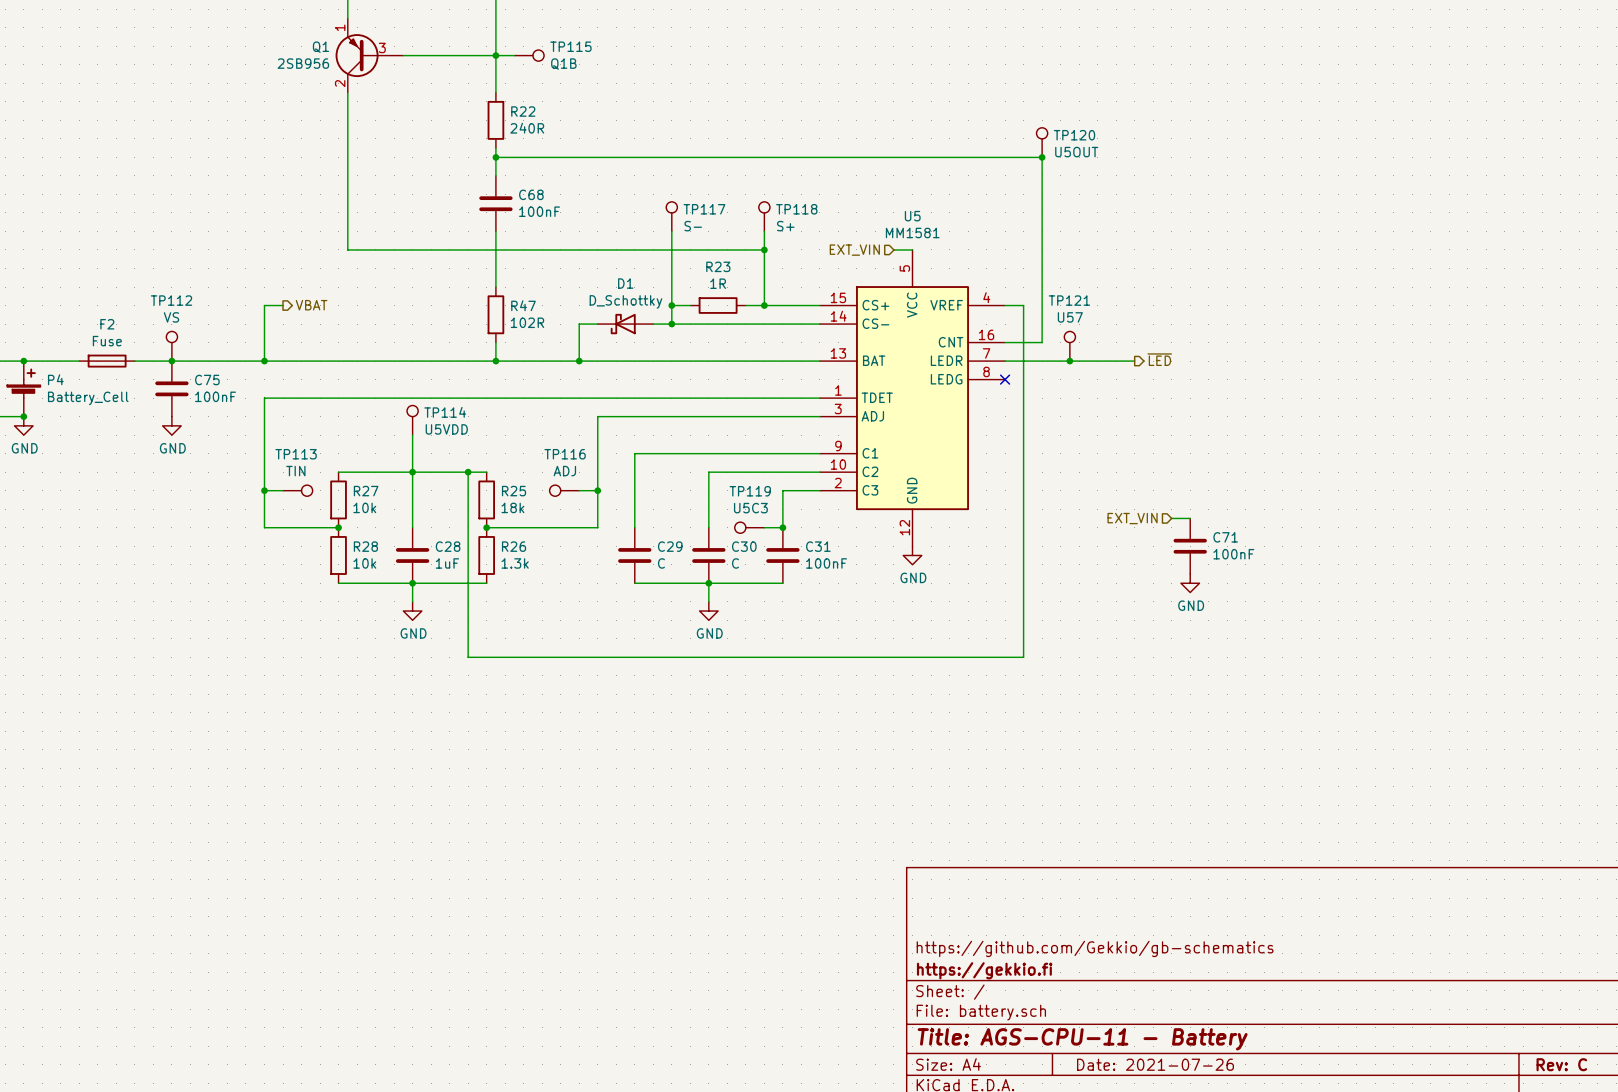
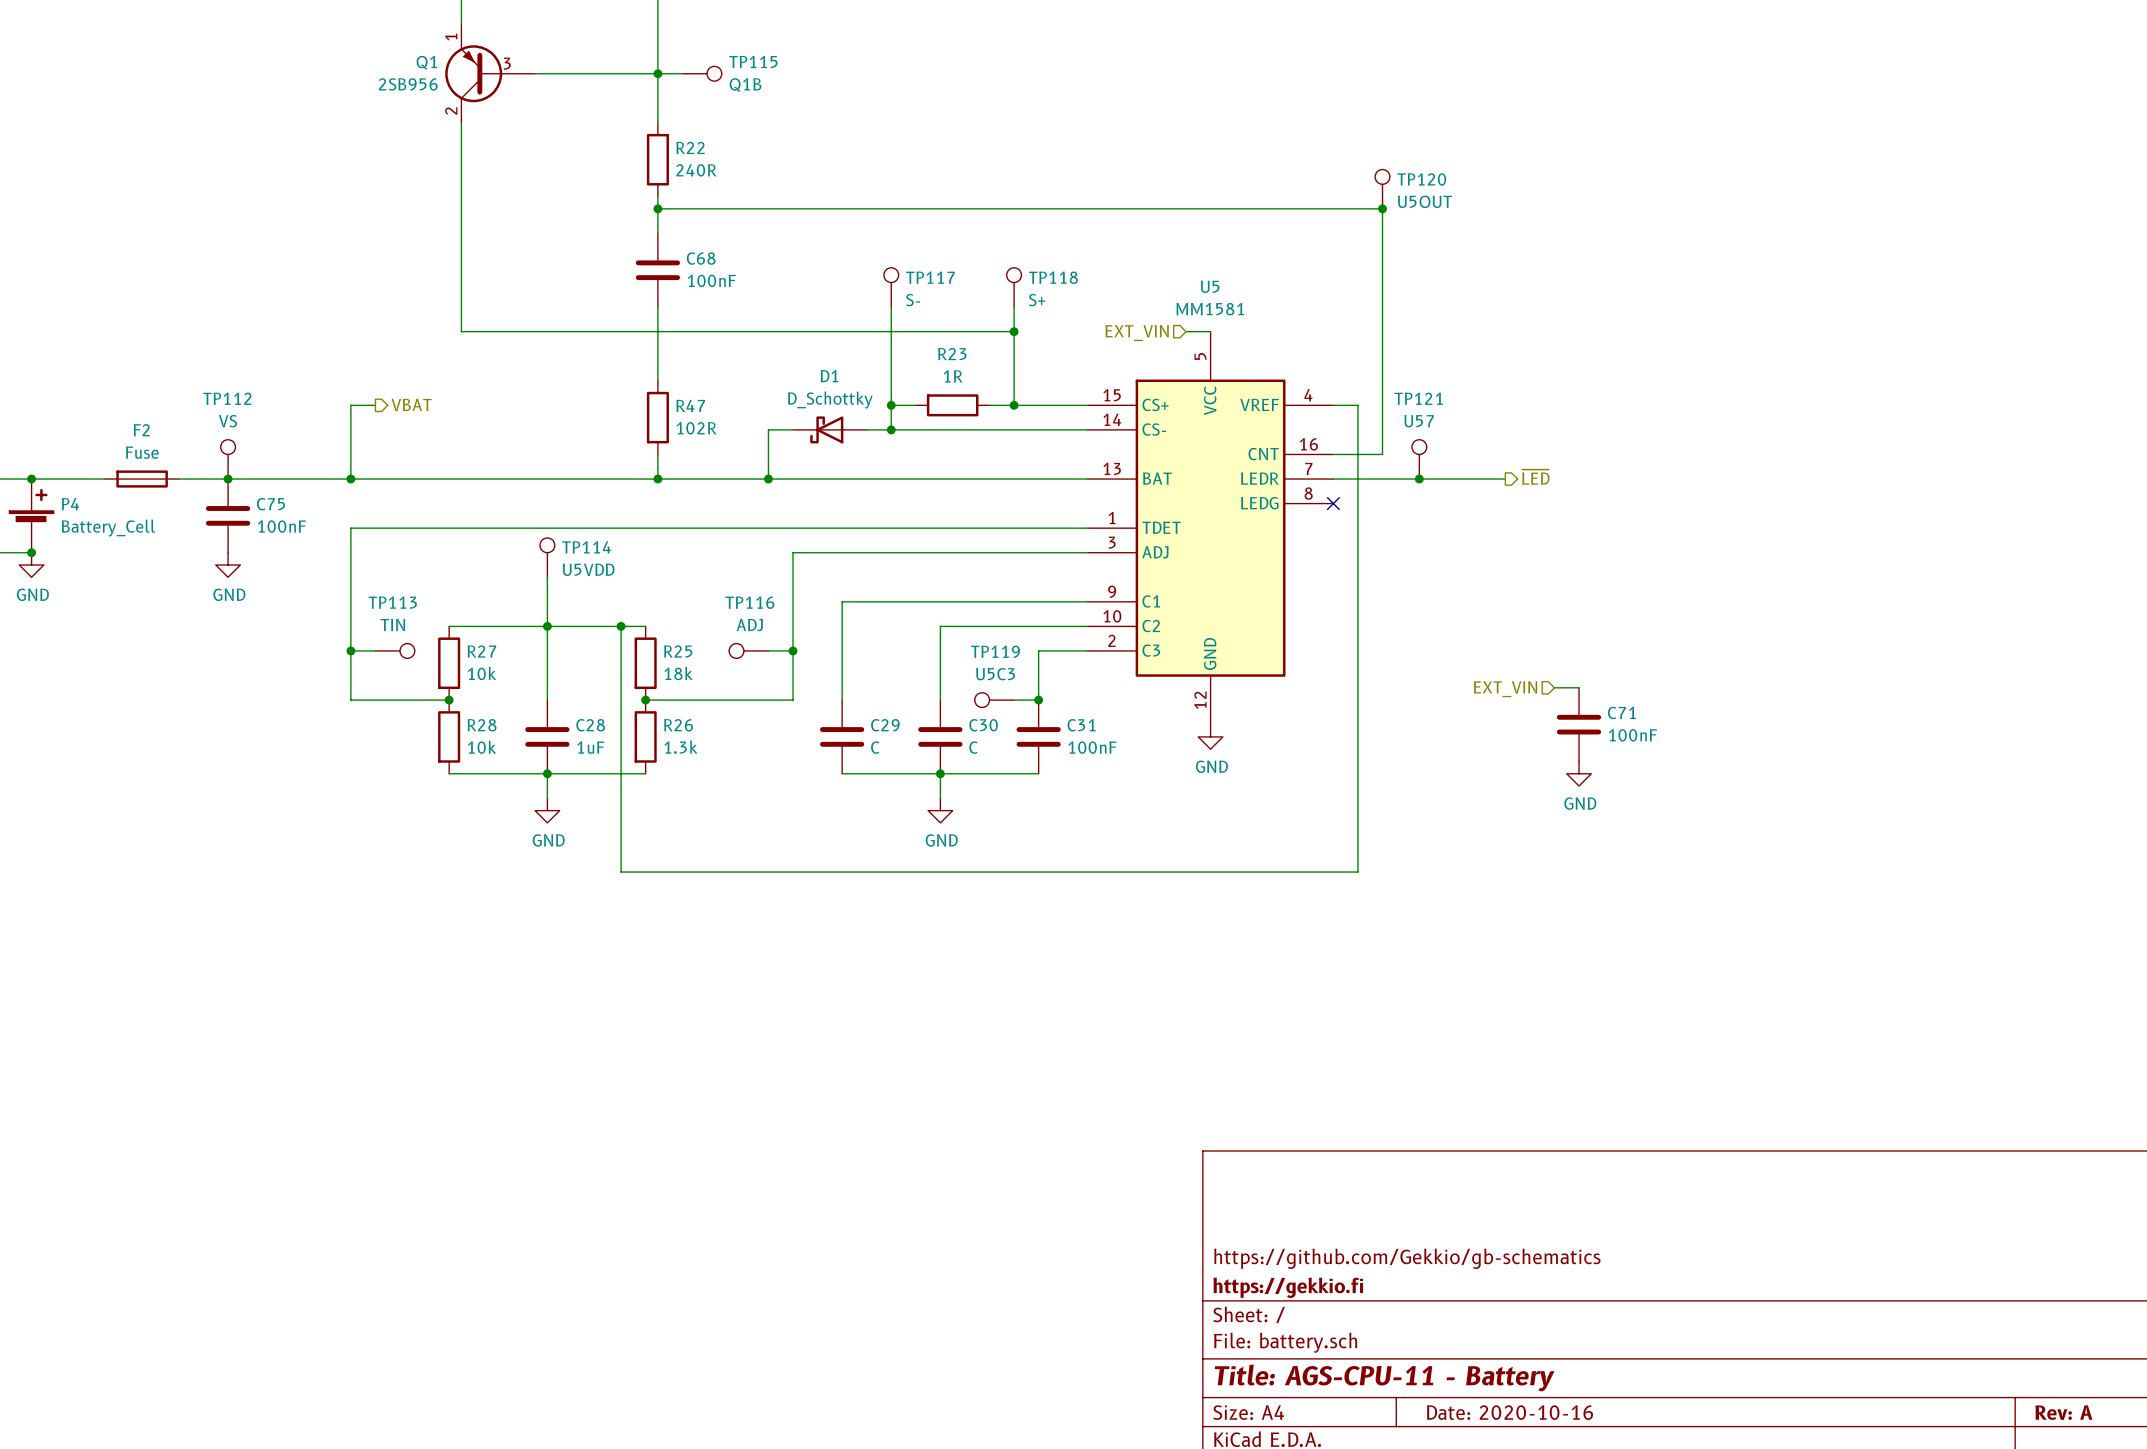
title block: Date: 2021-07-26 (1155, 1064) -> Date: 2020-10-16 (1509, 1412)
title block: Rev: C (1561, 1064) -> Rev: A (2063, 1412)

